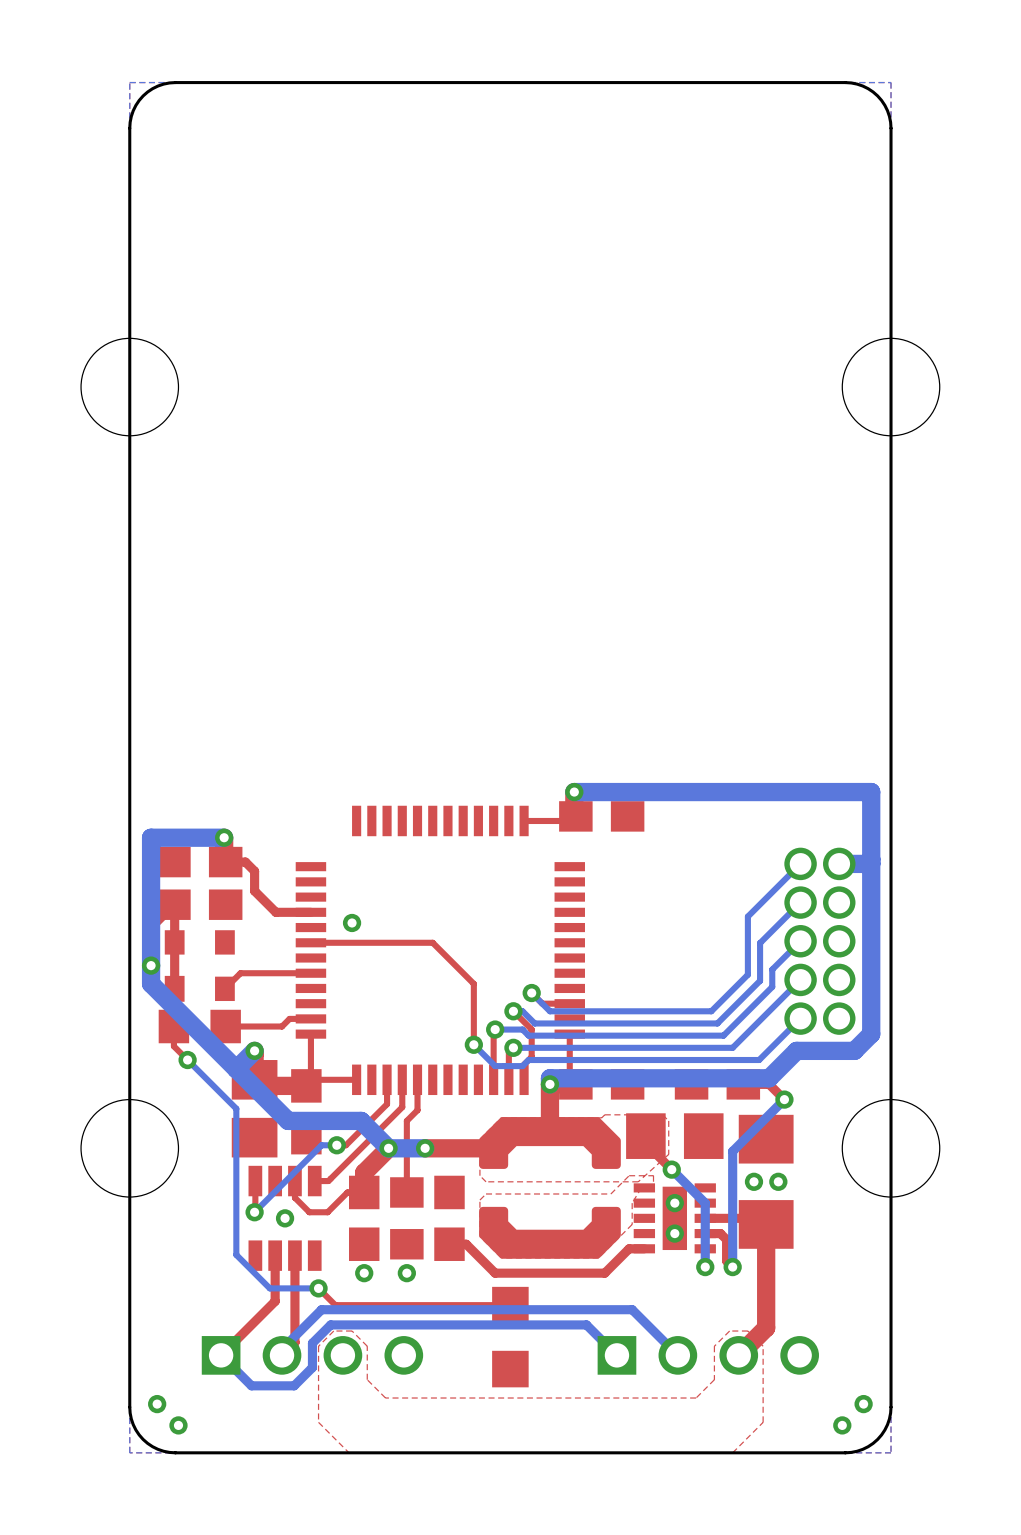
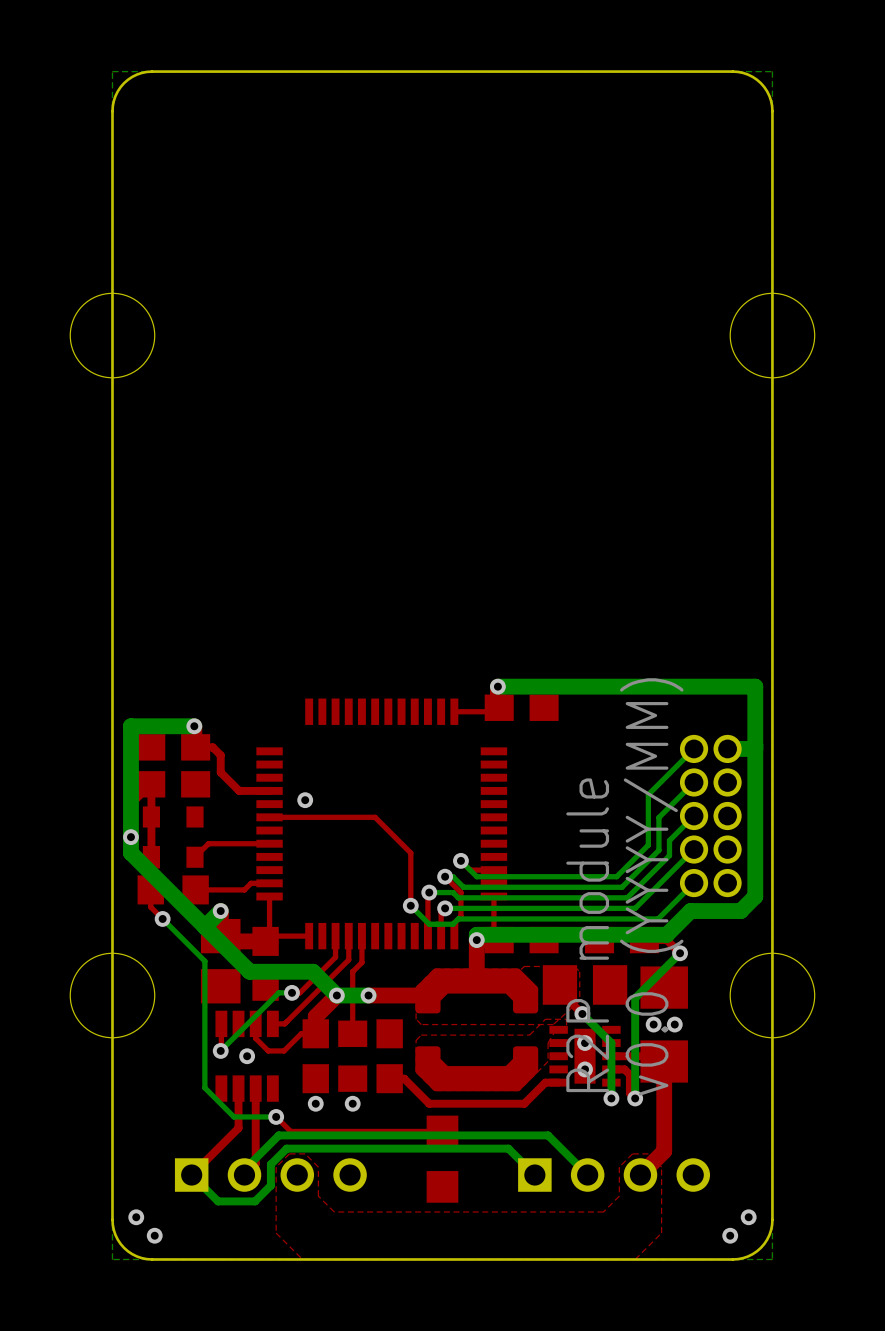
text: none -> v0.0 (YYYY/MM) (651, 886)
text: none -> R2P module (587, 935)

